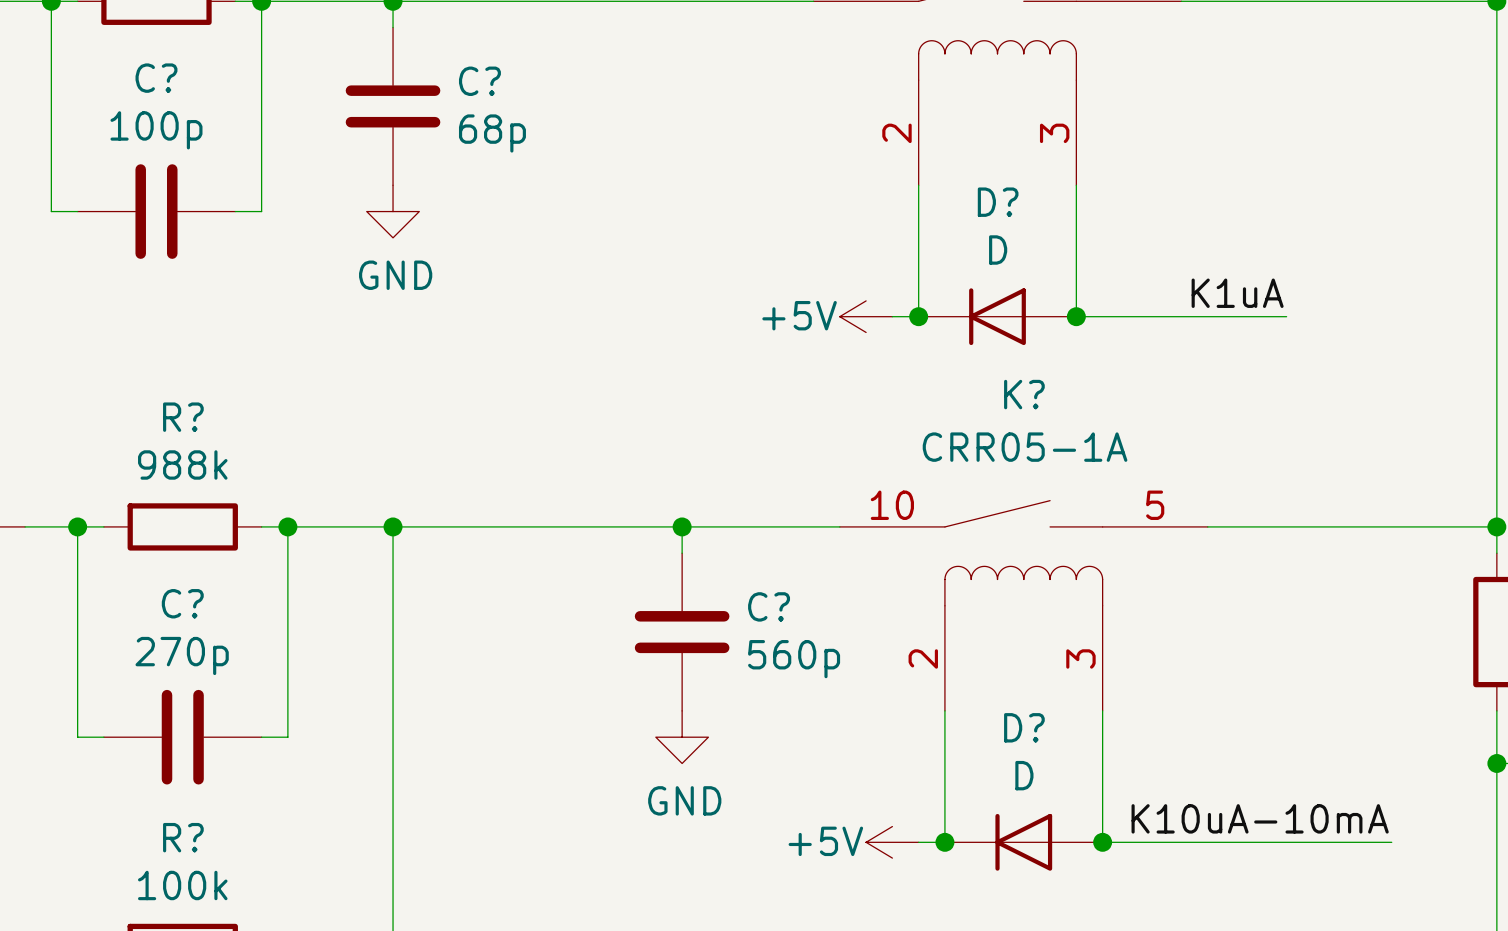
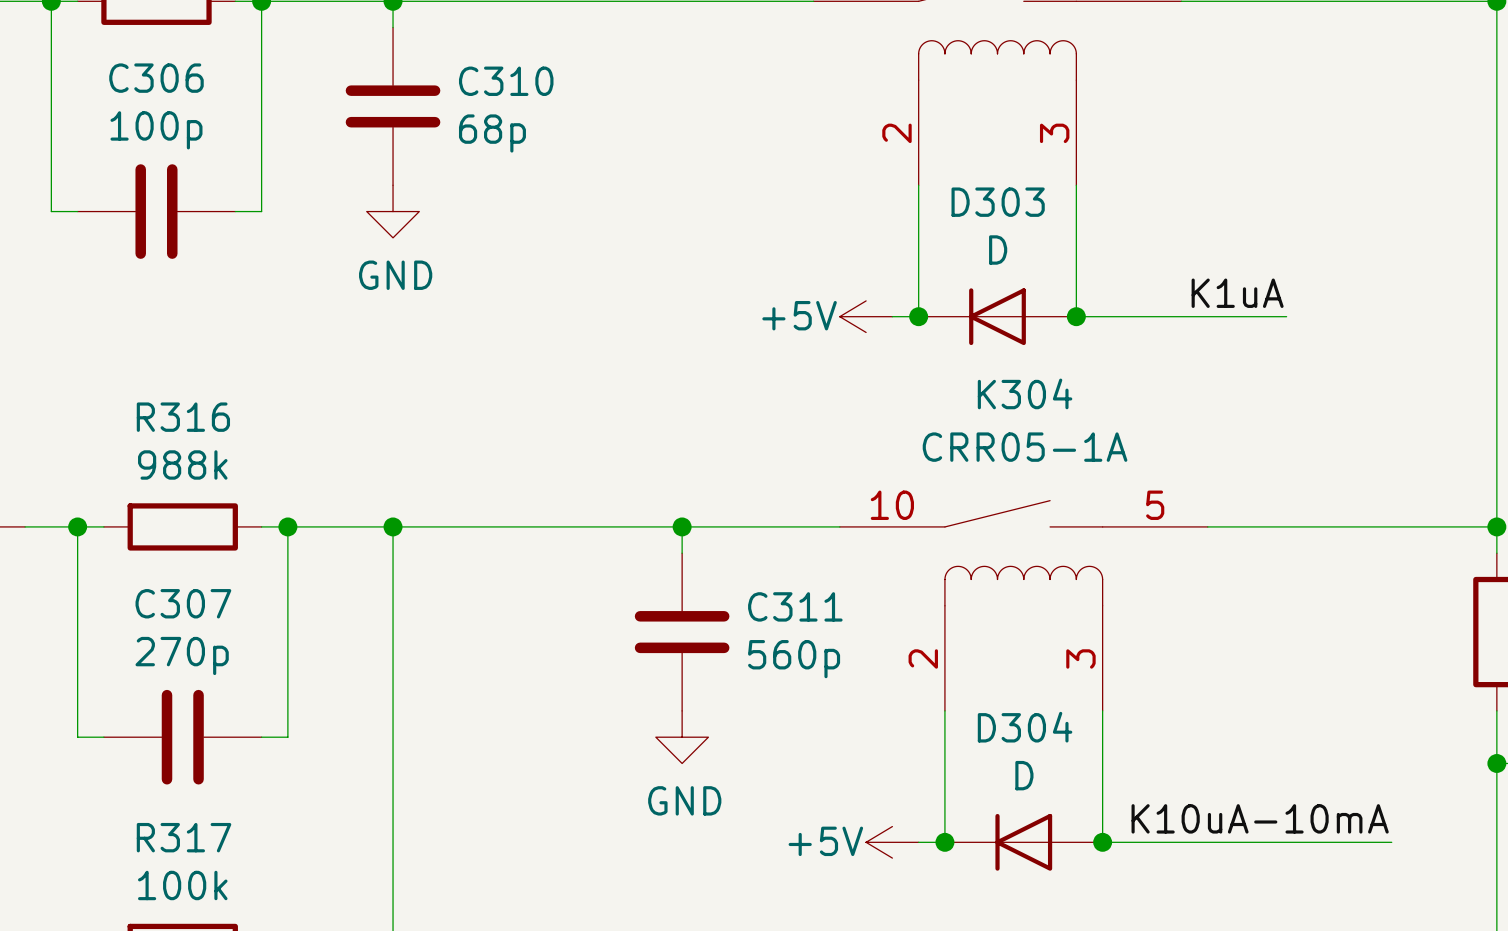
C? name: C? (156, 78) -> C306 (156, 78)
C? name: C? (479, 81) -> C310 (506, 81)
D? name: D? (998, 202) -> D303 (998, 202)
K? name: K? (1024, 394) -> K304 (1025, 393)
R? name: R? (183, 417) -> R316 (183, 417)
C? name: C? (182, 603) -> C307 (183, 603)
C? name: C? (769, 606) -> C311 (795, 606)
D? name: D? (1024, 727) -> D304 (1025, 727)
R? name: R? (183, 837) -> R317 (184, 837)

